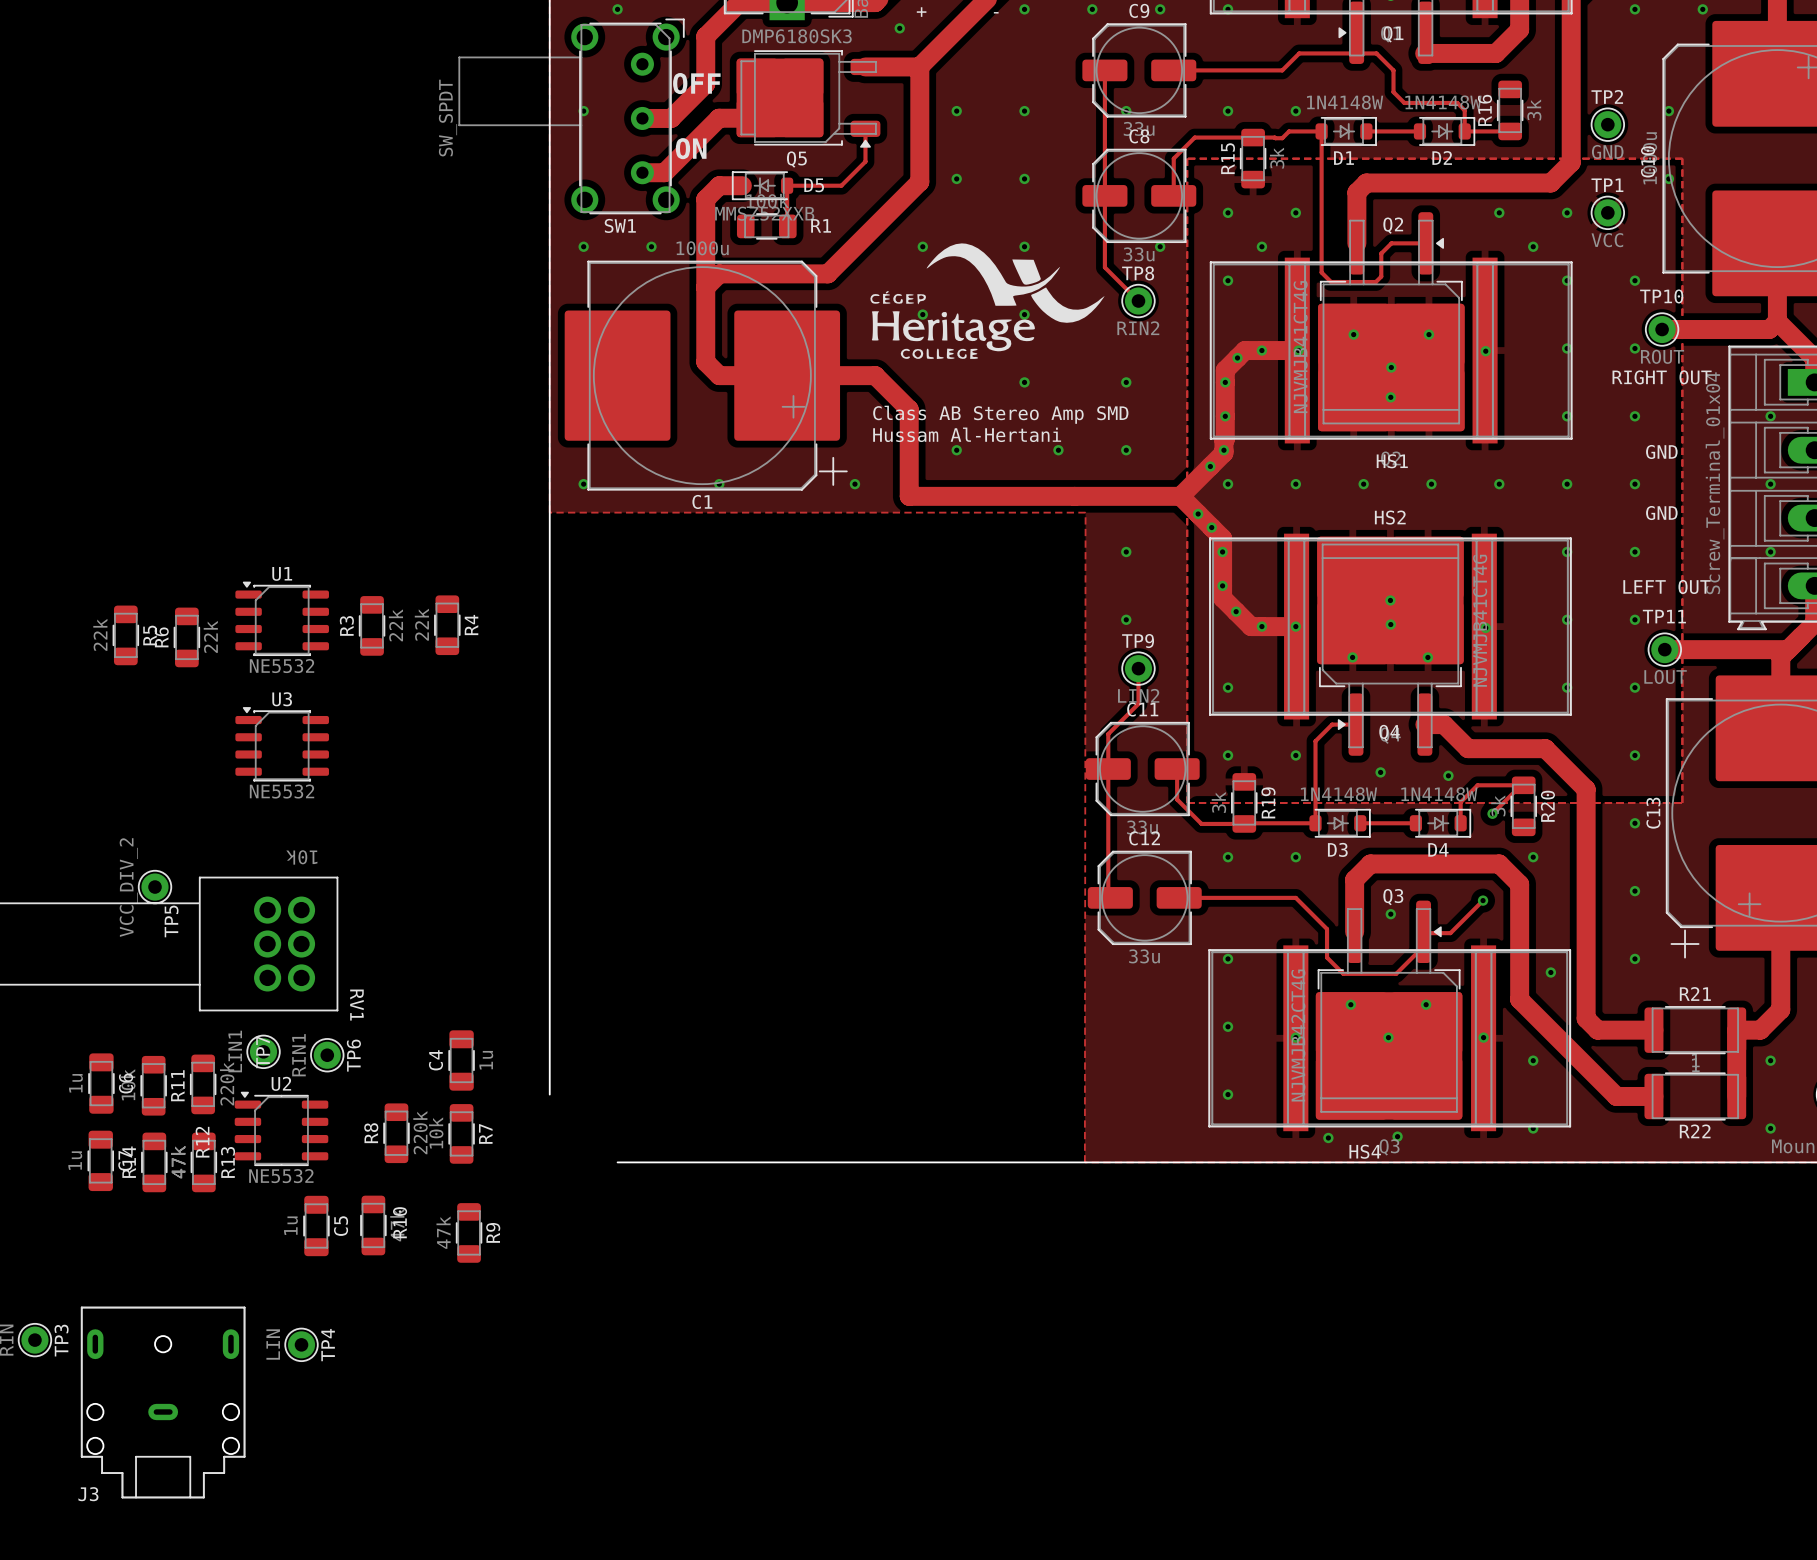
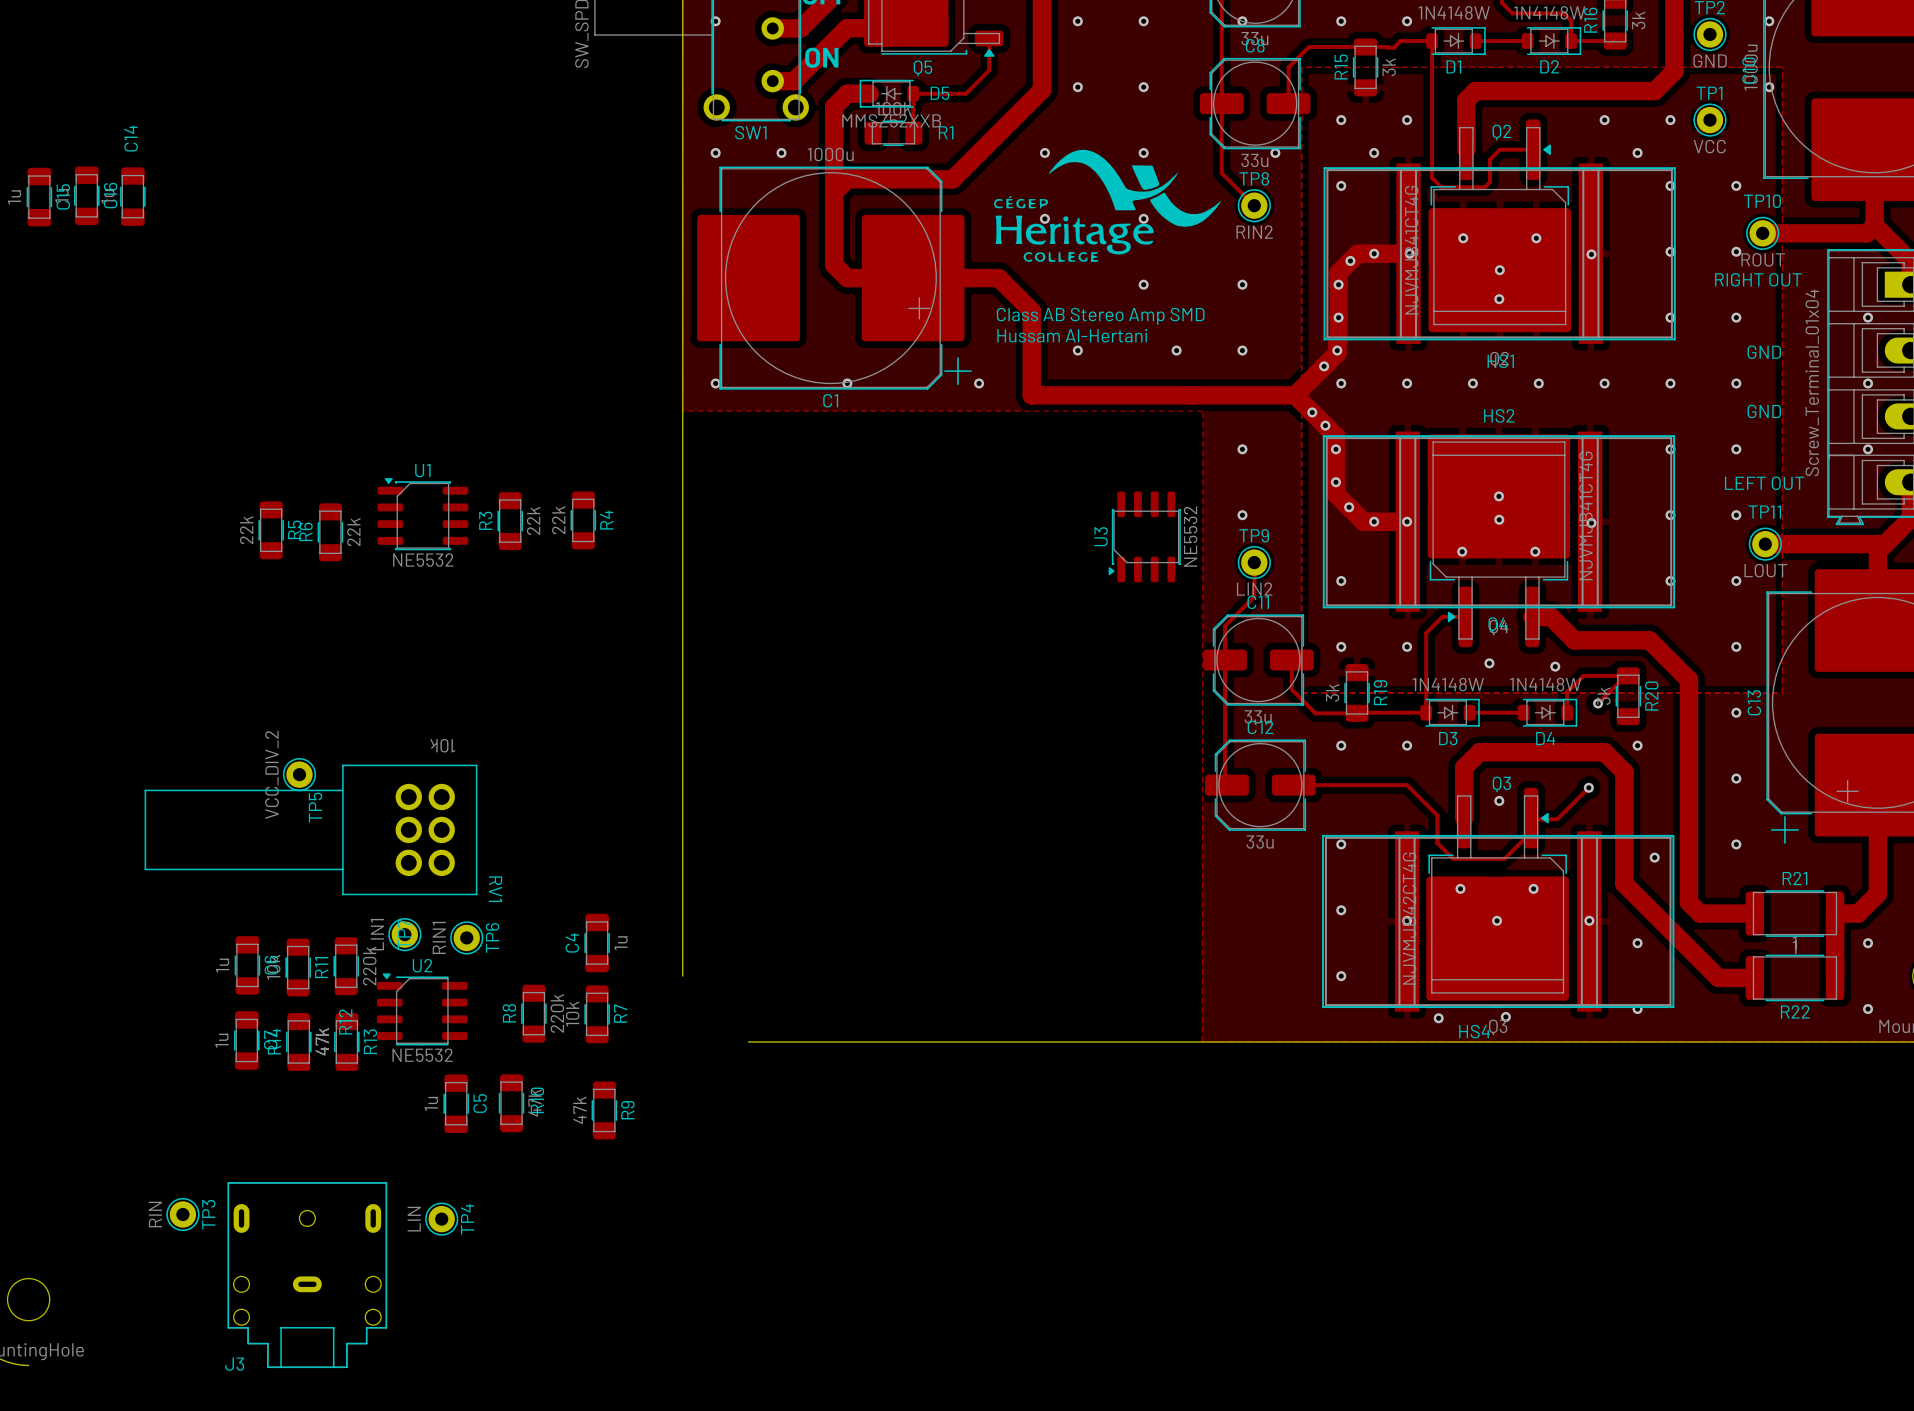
U3 rotation: 0° (282, 744) -> 90° counterclockwise (1144, 536)
U3 position: (282, 744) -> (1144, 536)

